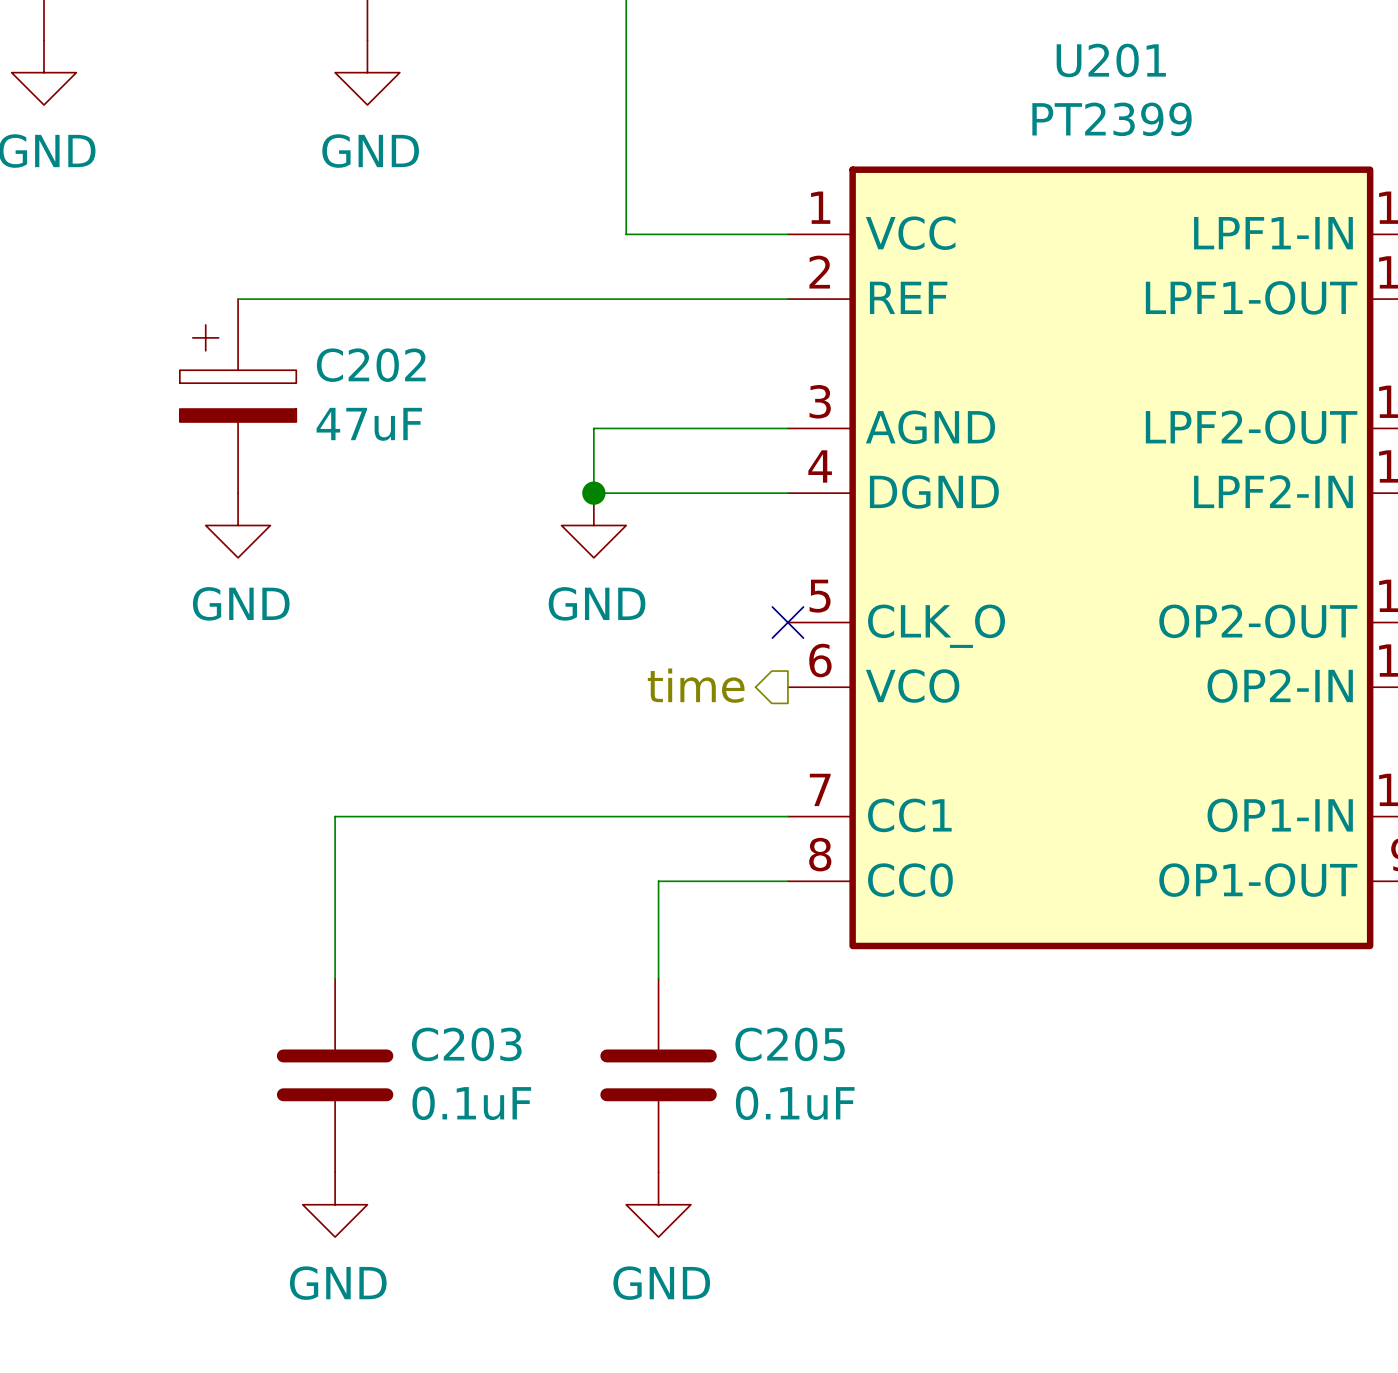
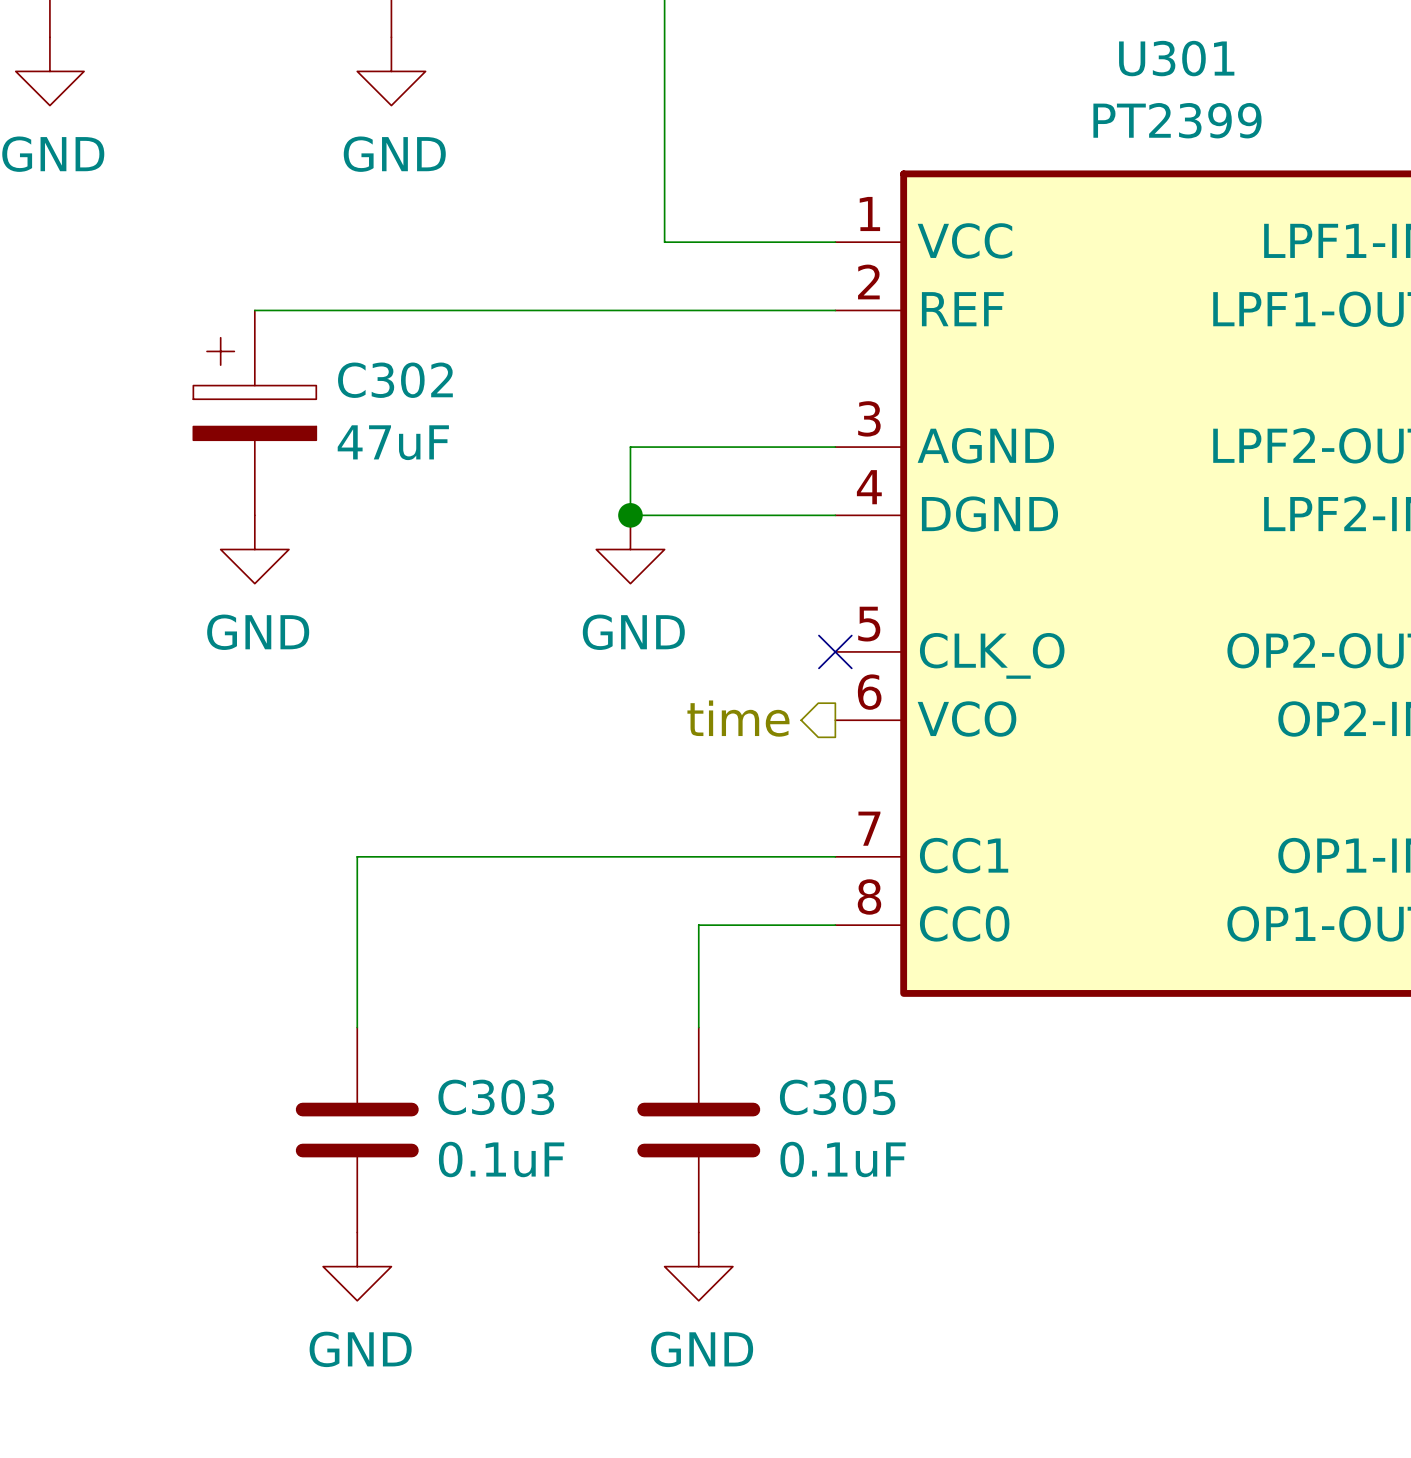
U201 name: U201 (1111, 60) -> U301 (1176, 58)
C202 name: C202 (371, 365) -> C302 (395, 380)
C203 name: C203 (466, 1044) -> C303 (496, 1097)
C205 name: C205 (790, 1044) -> C305 (837, 1097)

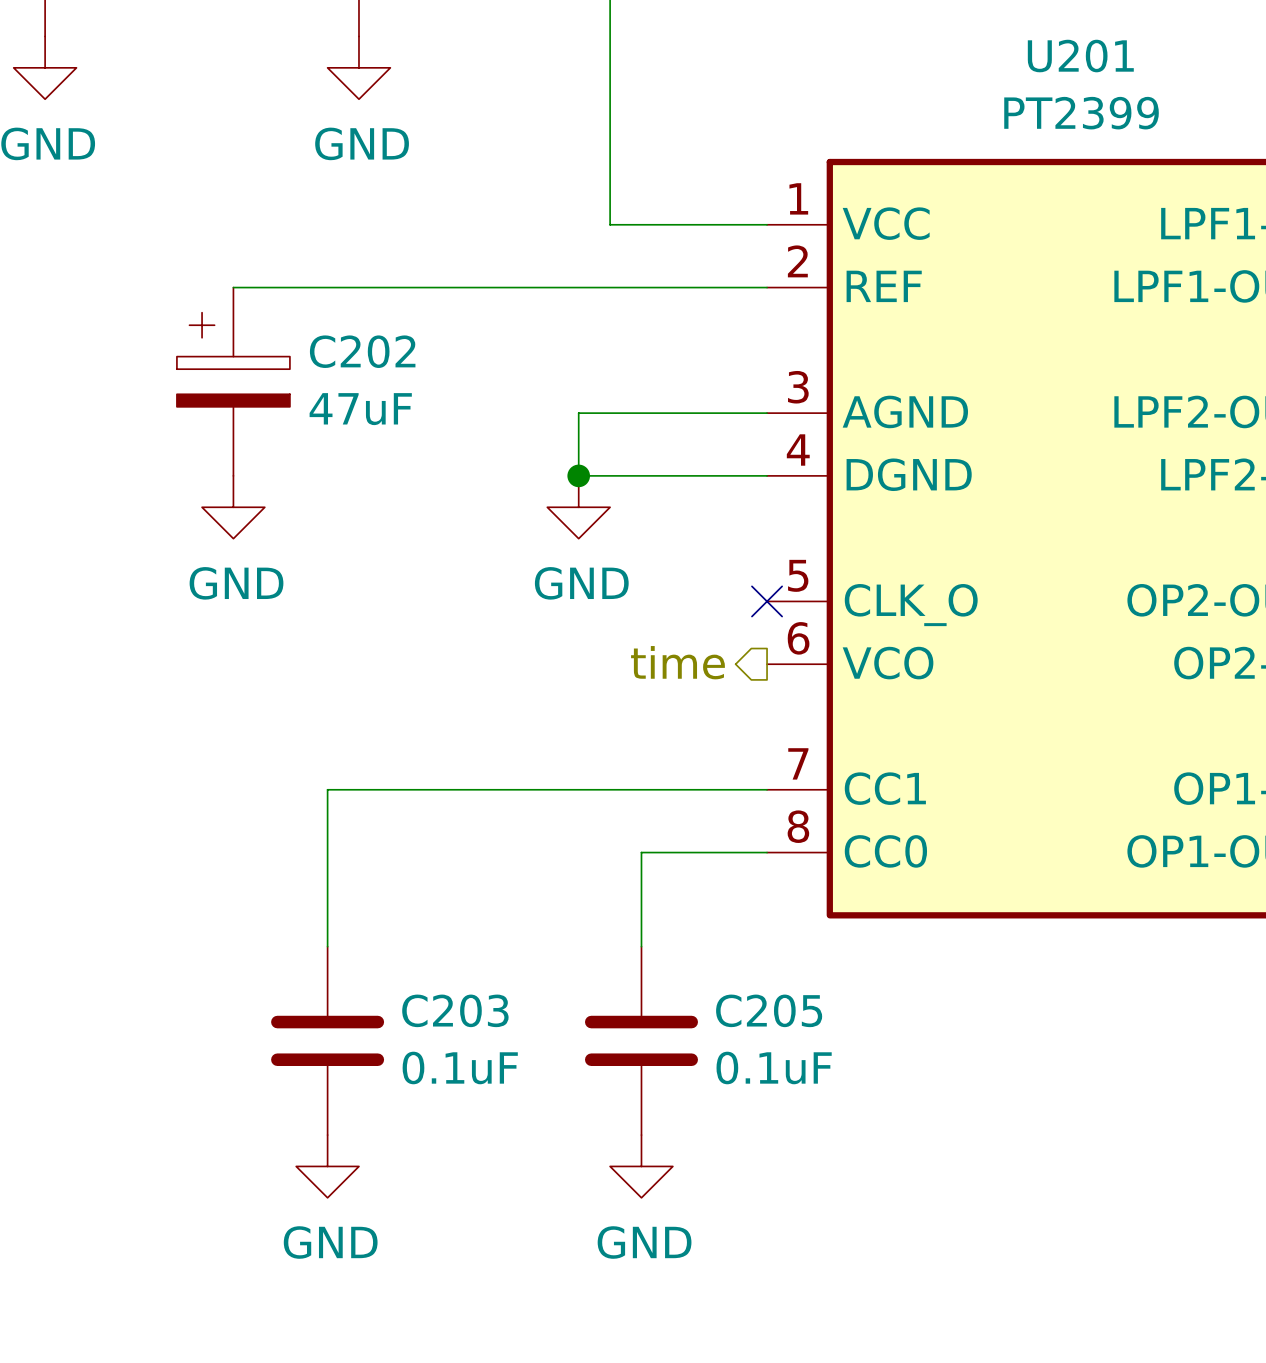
U301 name: U301 (1176, 58) -> U201 (1080, 56)
C302 name: C302 (395, 380) -> C202 (362, 351)
C303 name: C303 (496, 1097) -> C203 (455, 1010)
C305 name: C305 (837, 1097) -> C205 (769, 1010)

